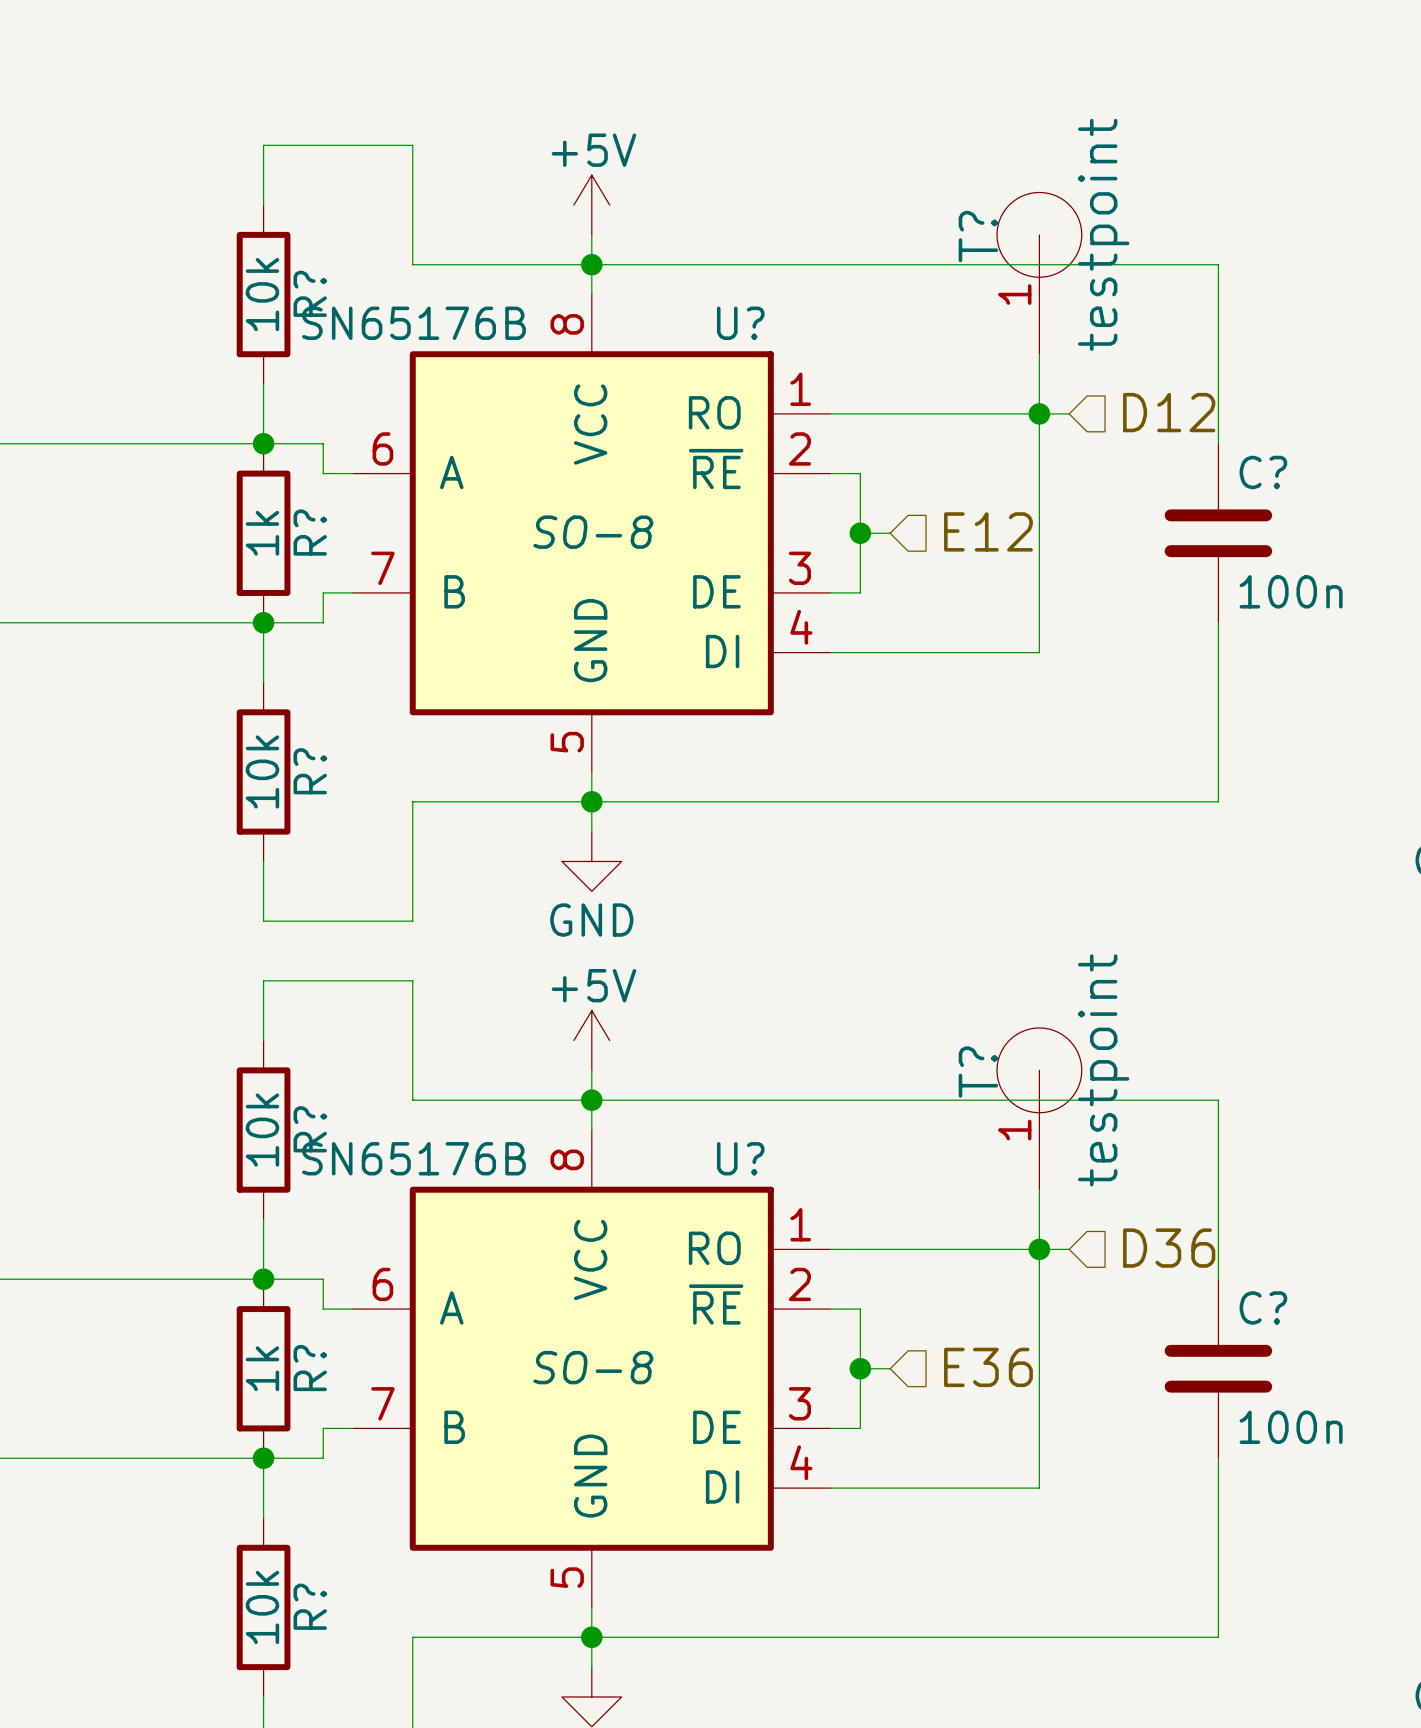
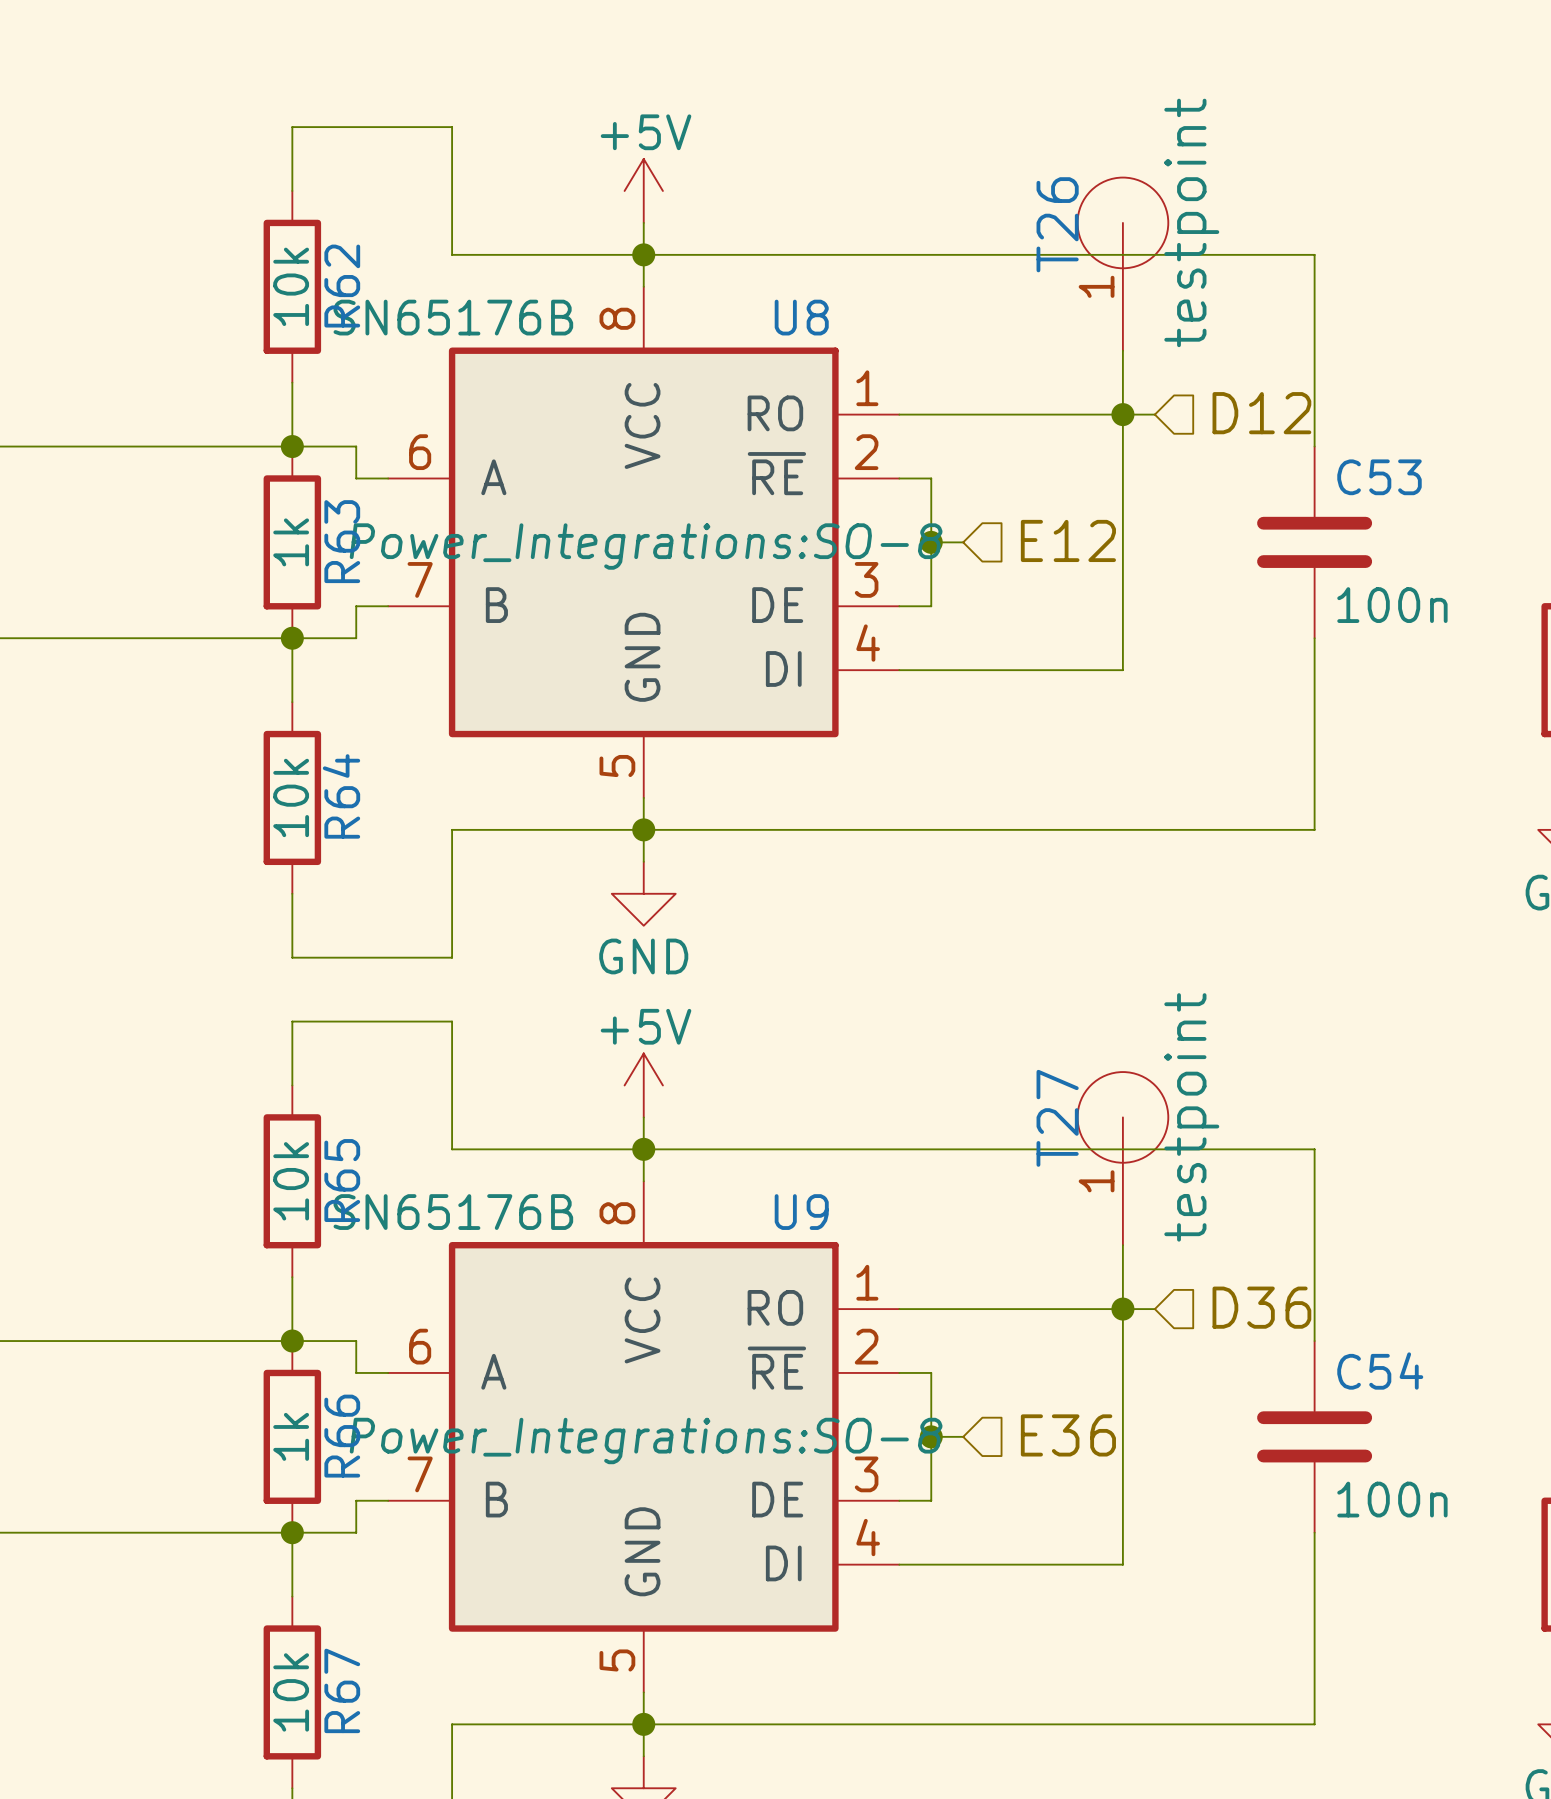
T? name: T? (978, 236) -> T26 (1057, 224)
R? name: R? (310, 293) -> R62 (342, 286)
U? name: U? (740, 323) -> U8 (801, 317)
C? name: C? (1263, 472) -> C53 (1379, 477)
R? name: R? (310, 532) -> R63 (342, 541)
U? text: SO-8 (593, 532) -> Power_Integrations:SO-8 (646, 546)
R? name: R? (310, 771) -> R64 (341, 796)
T? name: T? (978, 1072) -> T27 (1057, 1118)
R? name: R? (310, 1129) -> R65 (342, 1180)
U? name: U? (740, 1158) -> U9 (801, 1212)
C? name: C? (1263, 1307) -> C54 (1380, 1371)
U? text: SO-8 (593, 1367) -> Power_Integrations:SO-8 (646, 1440)
R? name: R? (310, 1368) -> R66 (342, 1436)
R? name: R? (310, 1606) -> R67 (342, 1690)

